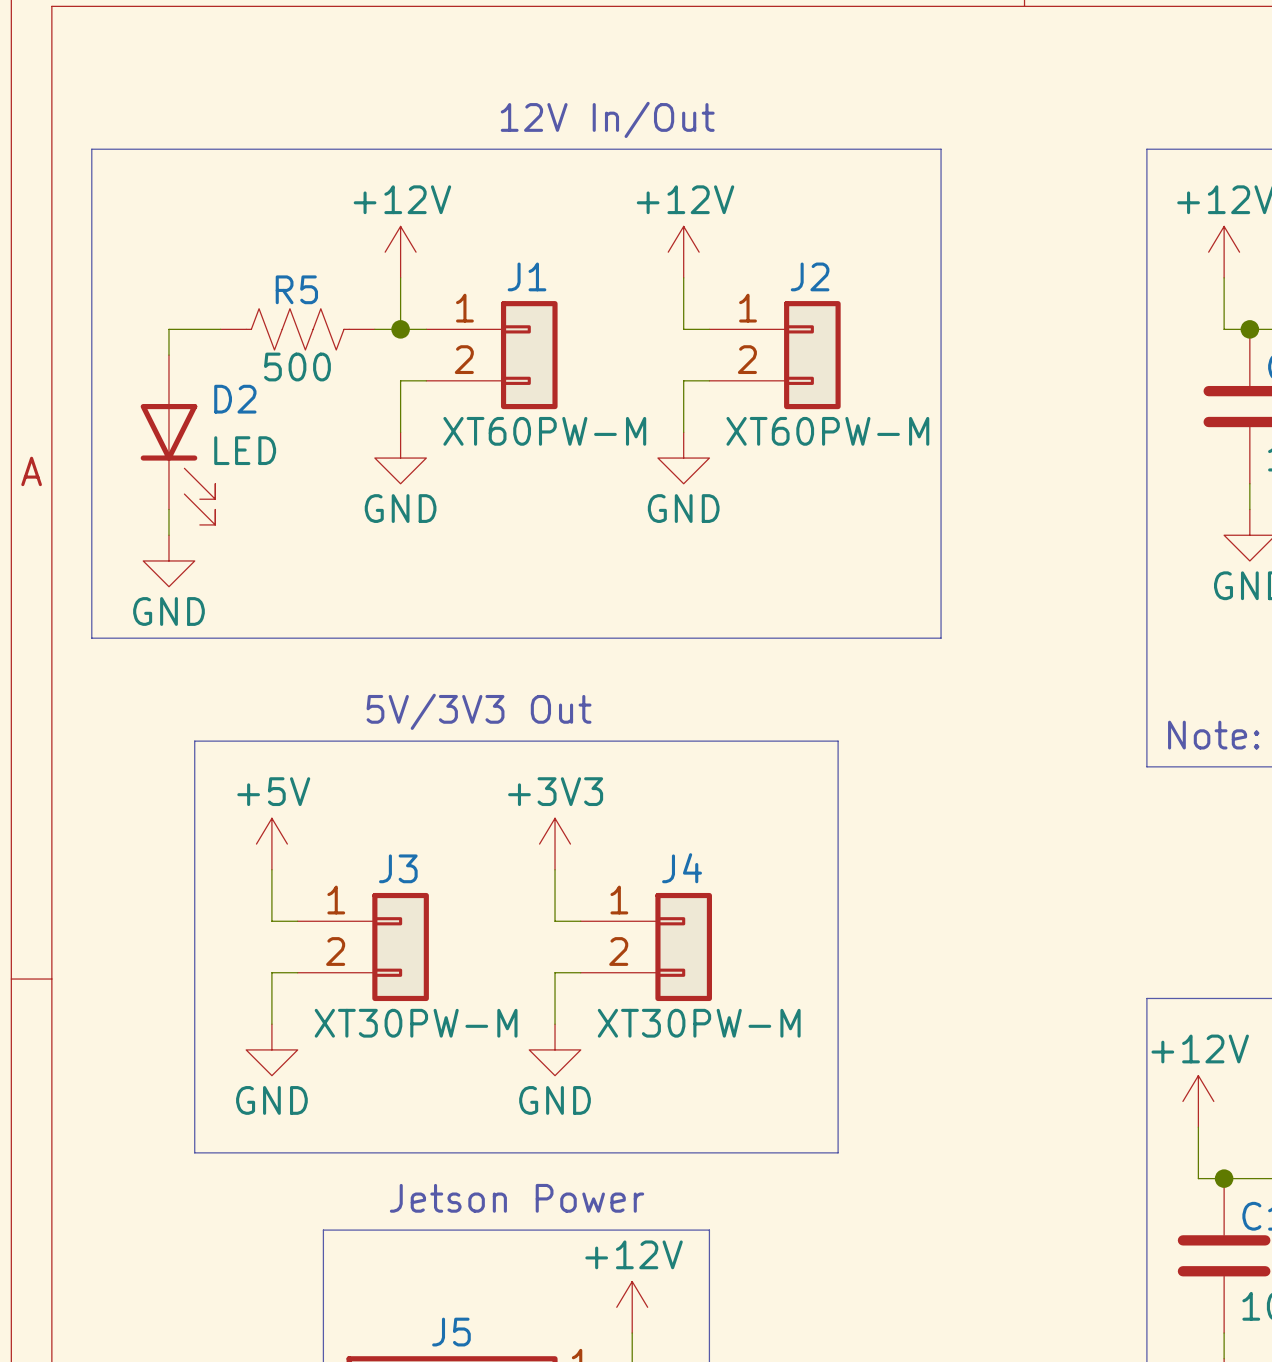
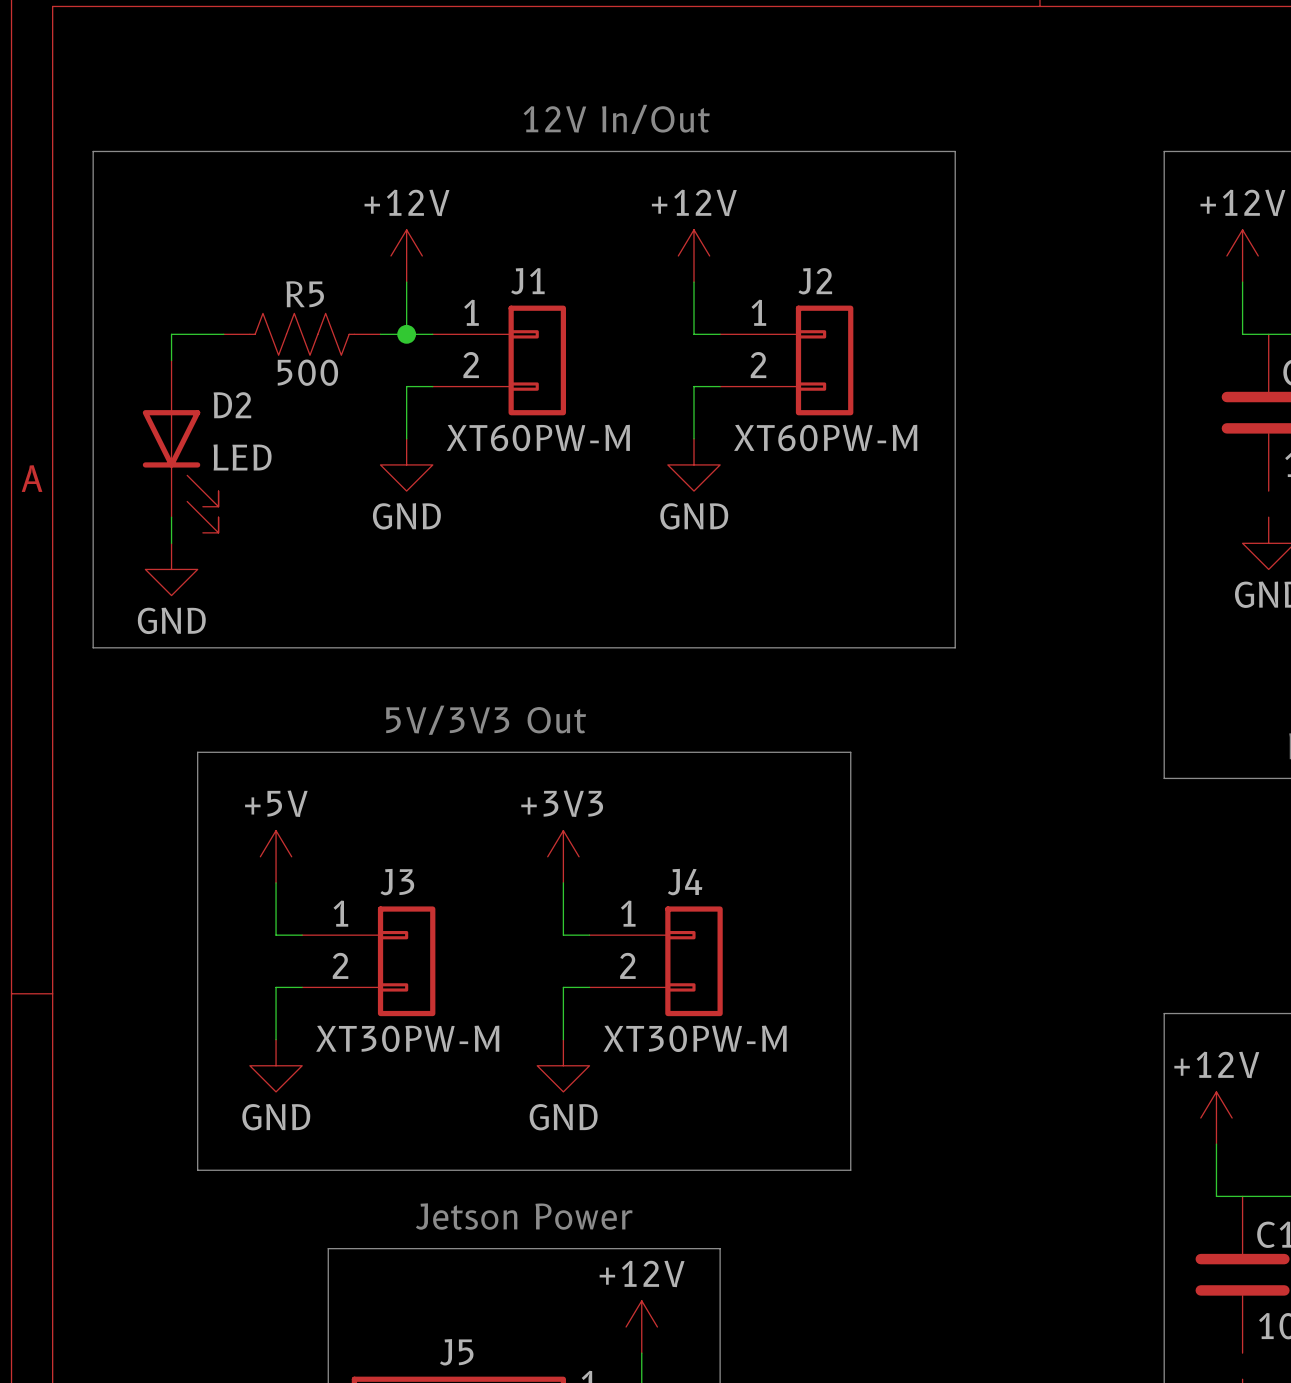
junction: (1249, 329) -> none
wire: (1249, 483) (1249, 509) -> none
junction: (1224, 1178) -> none
wire: (1224, 1333) (1224, 1358) -> none

